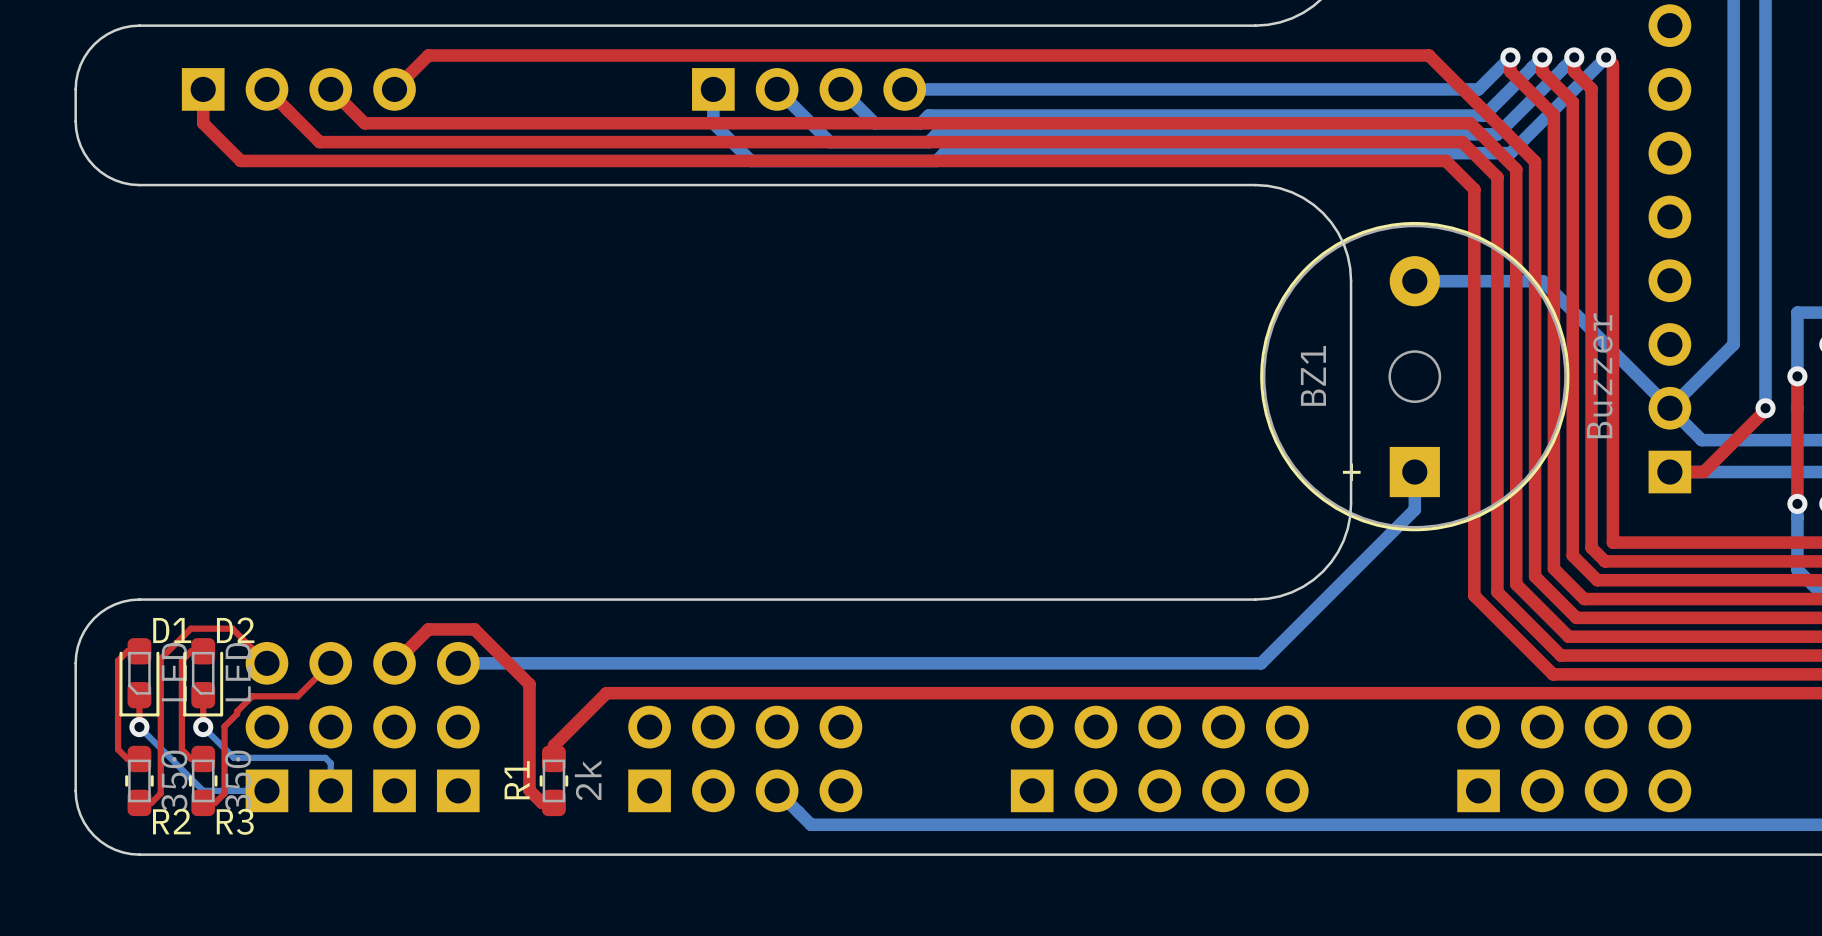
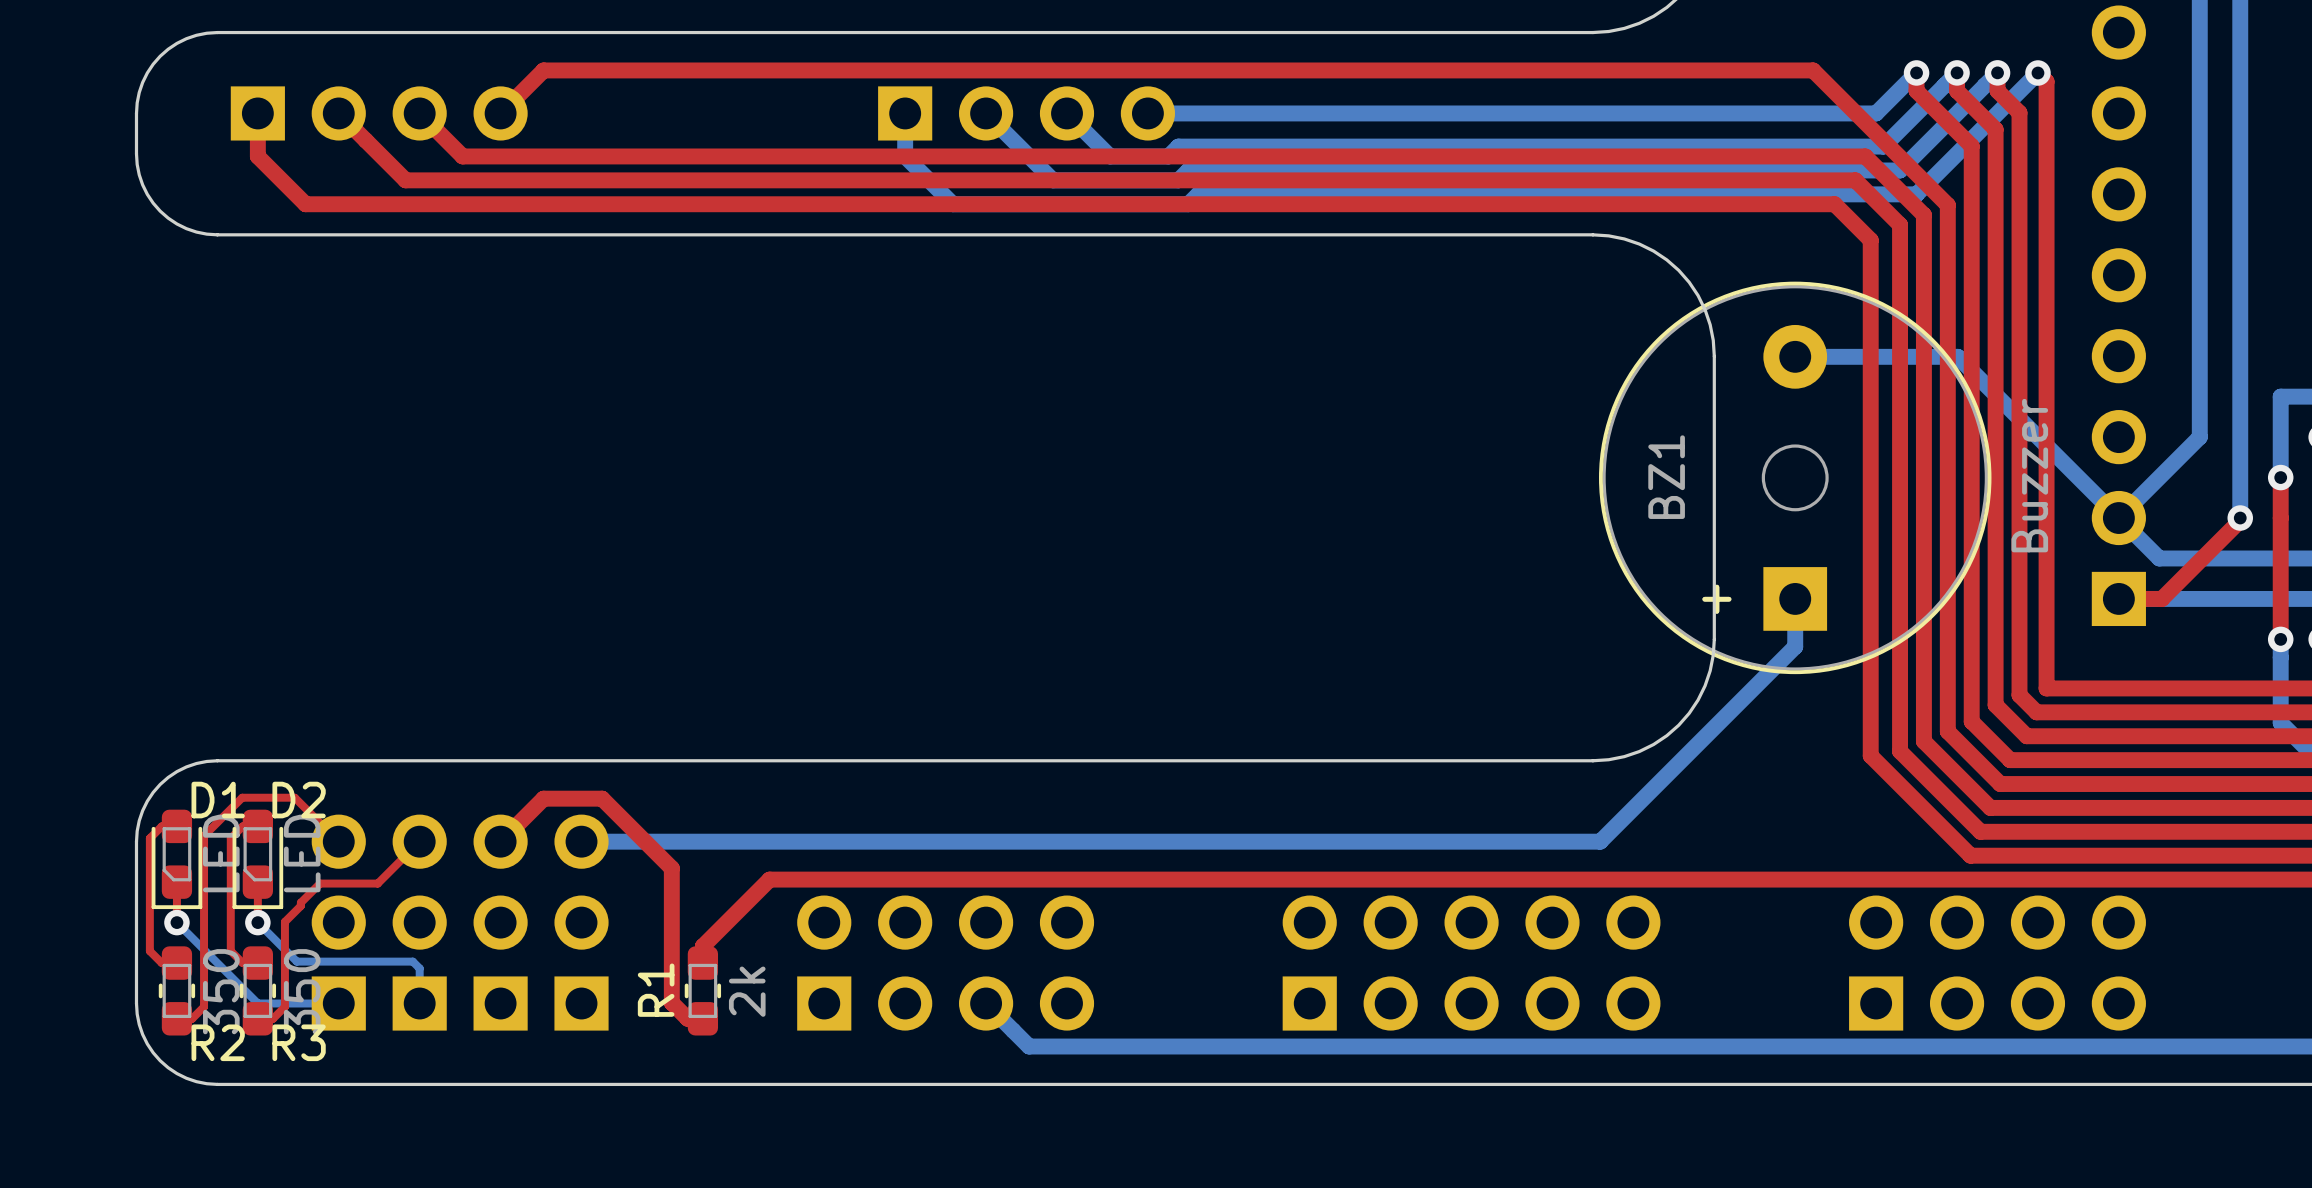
board edge: (171, 25) (122, 27) (107, 34) (94, 44) (84, 57) (77, 72) (75, 121) (77, 137) (84, 153) (94, 166) (107, 176) (131, 184) (171, 185) -> (217, 32) (186, 38) (160, 56) (142, 82) (136, 113) (137, 164) (147, 194) (160, 211) (176, 223) (196, 232) (217, 234)
board edge: (171, 599) (131, 600) (115, 604) (94, 618) (84, 631) (77, 646) (75, 663) (75, 790) (77, 807) (84, 822) (94, 835) (107, 846) (131, 854) (171, 854) -> (217, 760) (186, 766) (160, 784) (142, 810) (136, 841) (136, 1003) (139, 1024) (153, 1052) (168, 1067) (196, 1081) (217, 1084)

